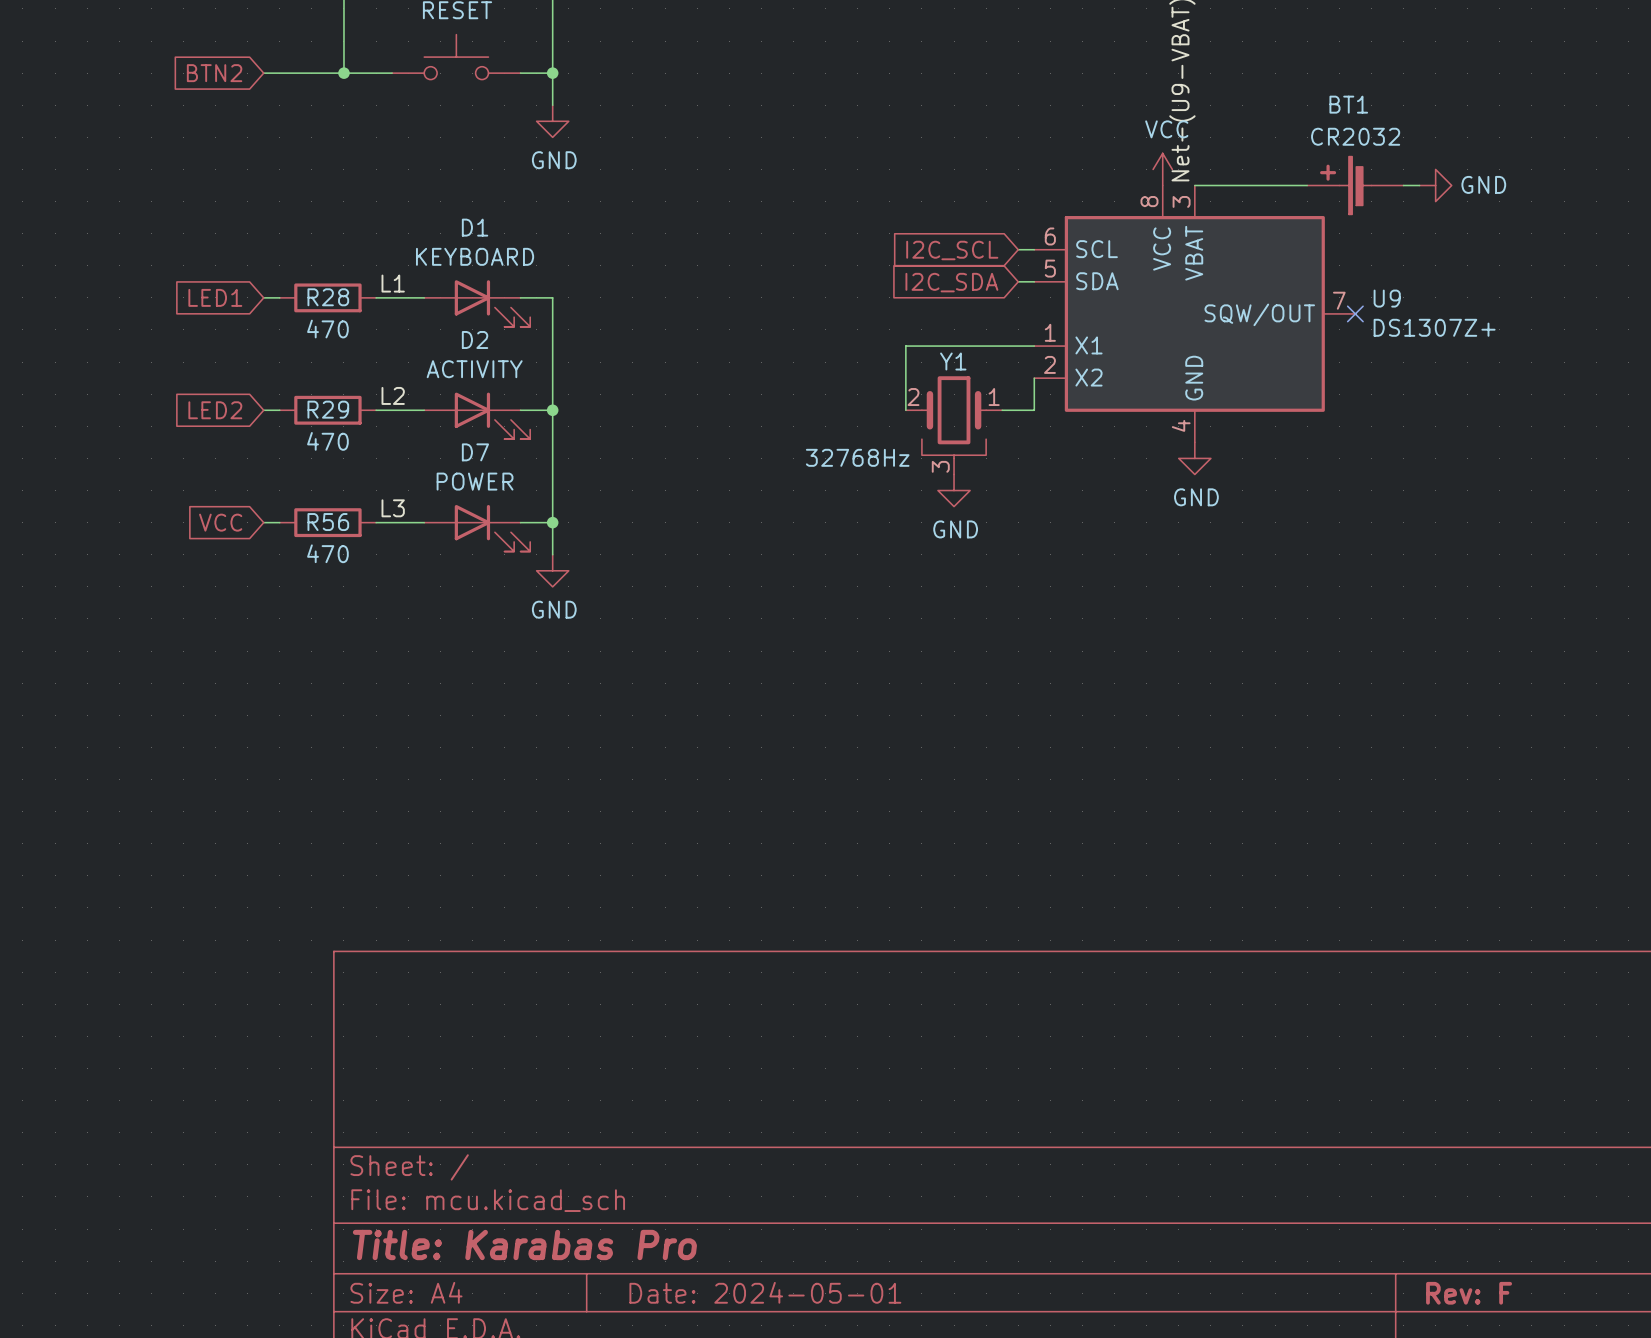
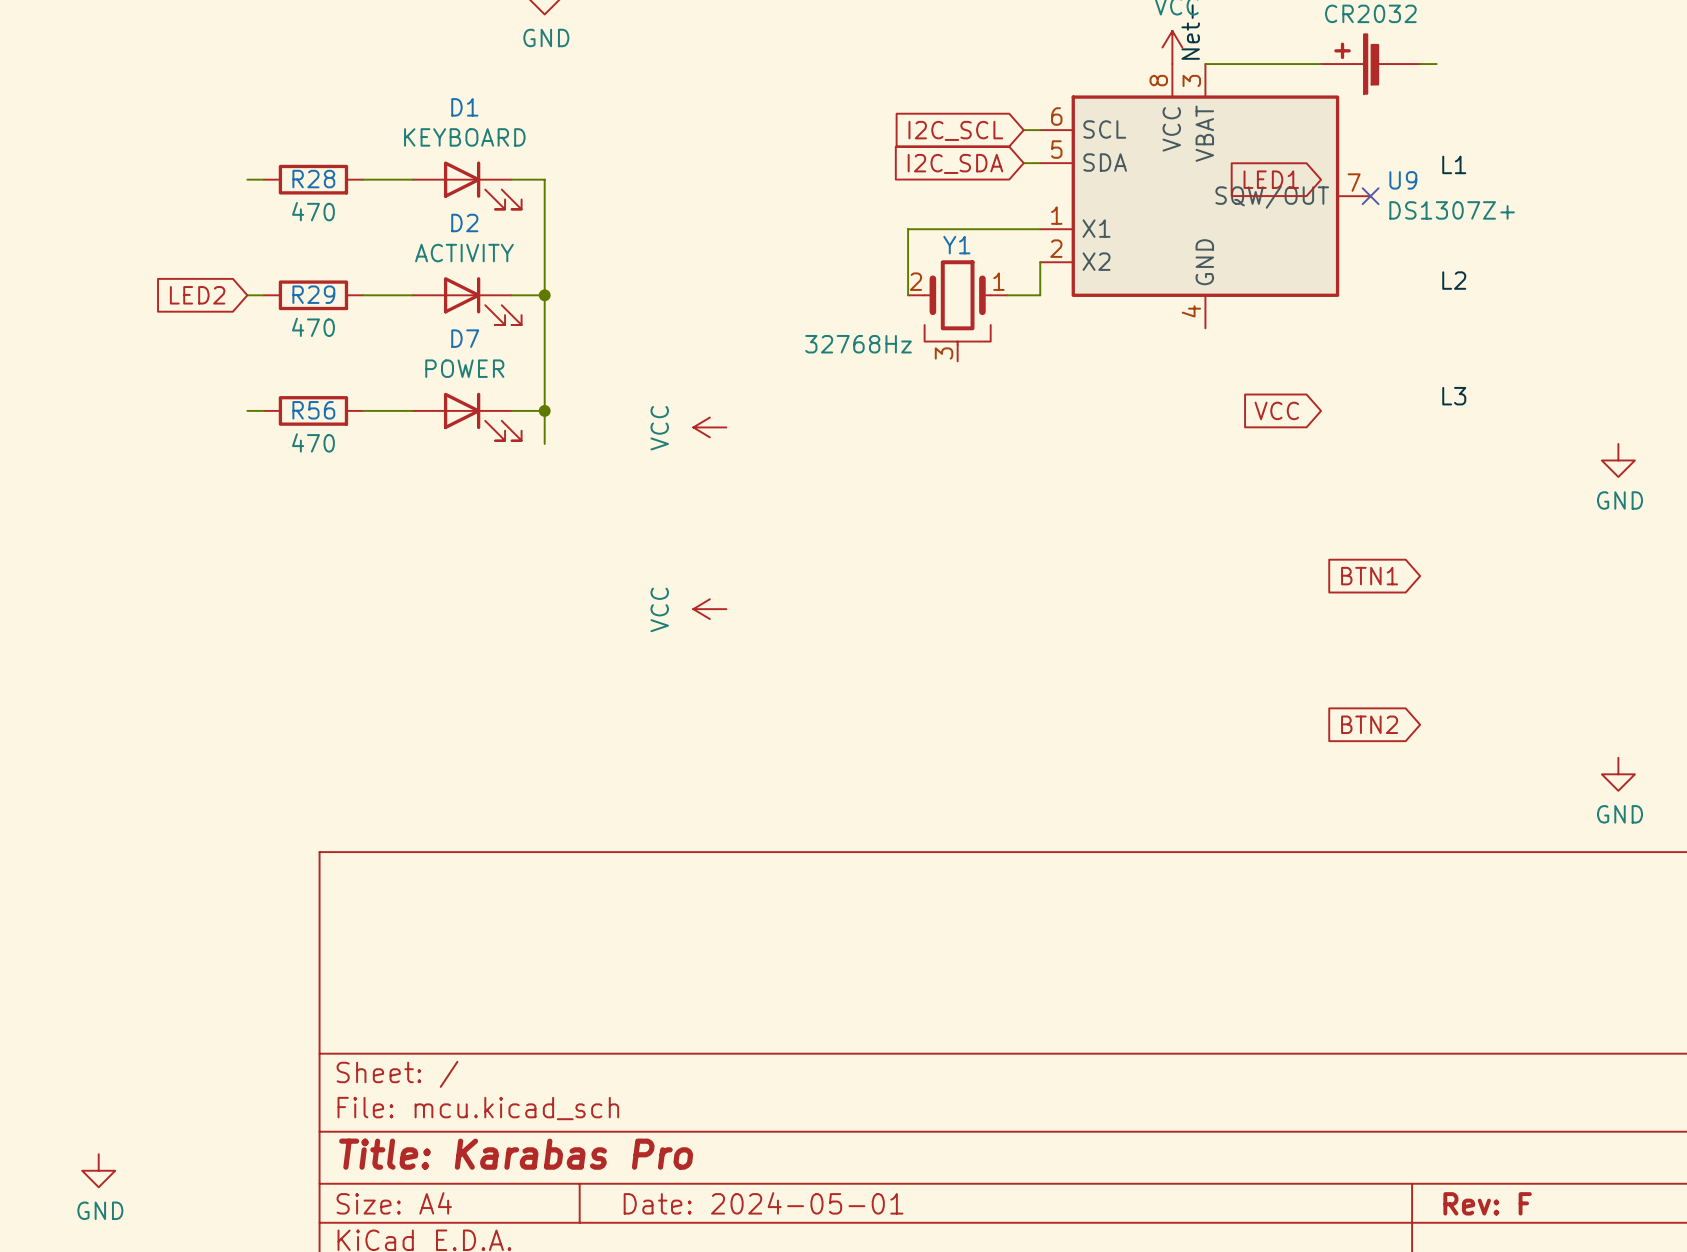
power symbol: GND (1435, 185) -> none
label: L1 (393, 283) -> none
label: none -> L1 (1454, 164)
global label: LED1 (215, 297) -> none
global label: none -> LED1 (1271, 179)
label: L2 (393, 395) -> none
label: none -> L2 (1454, 280)
power symbol: GND (1194, 458) -> none
power symbol: GND (954, 490) -> none
label: L3 (393, 508) -> none
label: none -> L3 (1454, 396)
global label: VCC (220, 522) -> none
global label: none -> VCC (1276, 410)
power symbol: none -> VCC (709, 427)
power symbol: GND (552, 570) -> none
power symbol: none -> GND (1618, 460)
global label: none -> BTN1 (1369, 576)
power symbol: none -> VCC (709, 609)
global label: none -> BTN2 (1369, 724)
power symbol: none -> GND (1618, 774)
power symbol: none -> GND (98, 1170)

